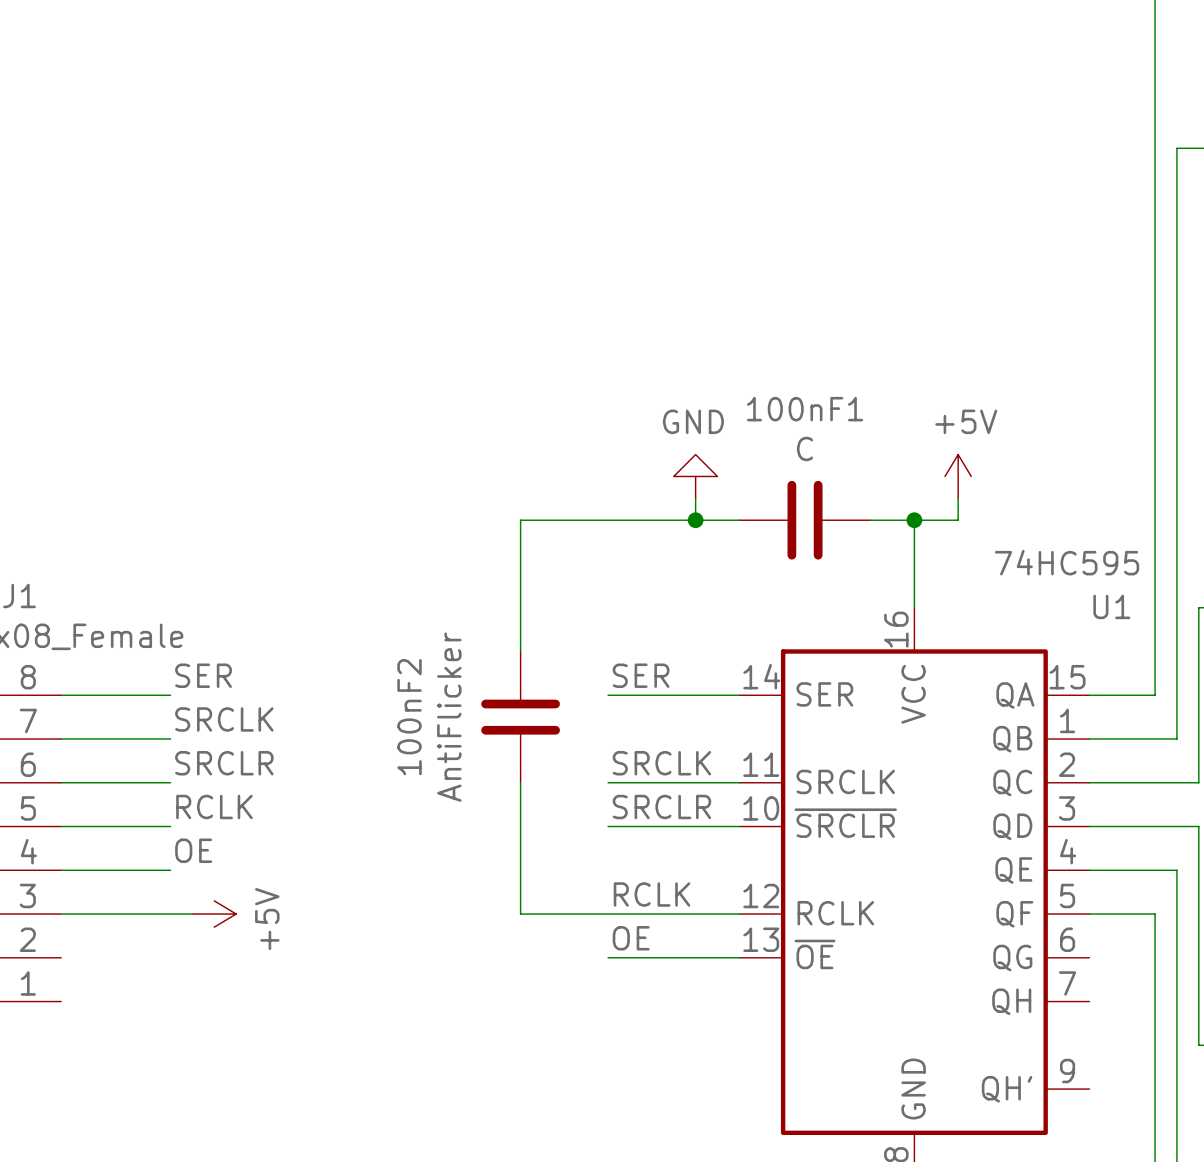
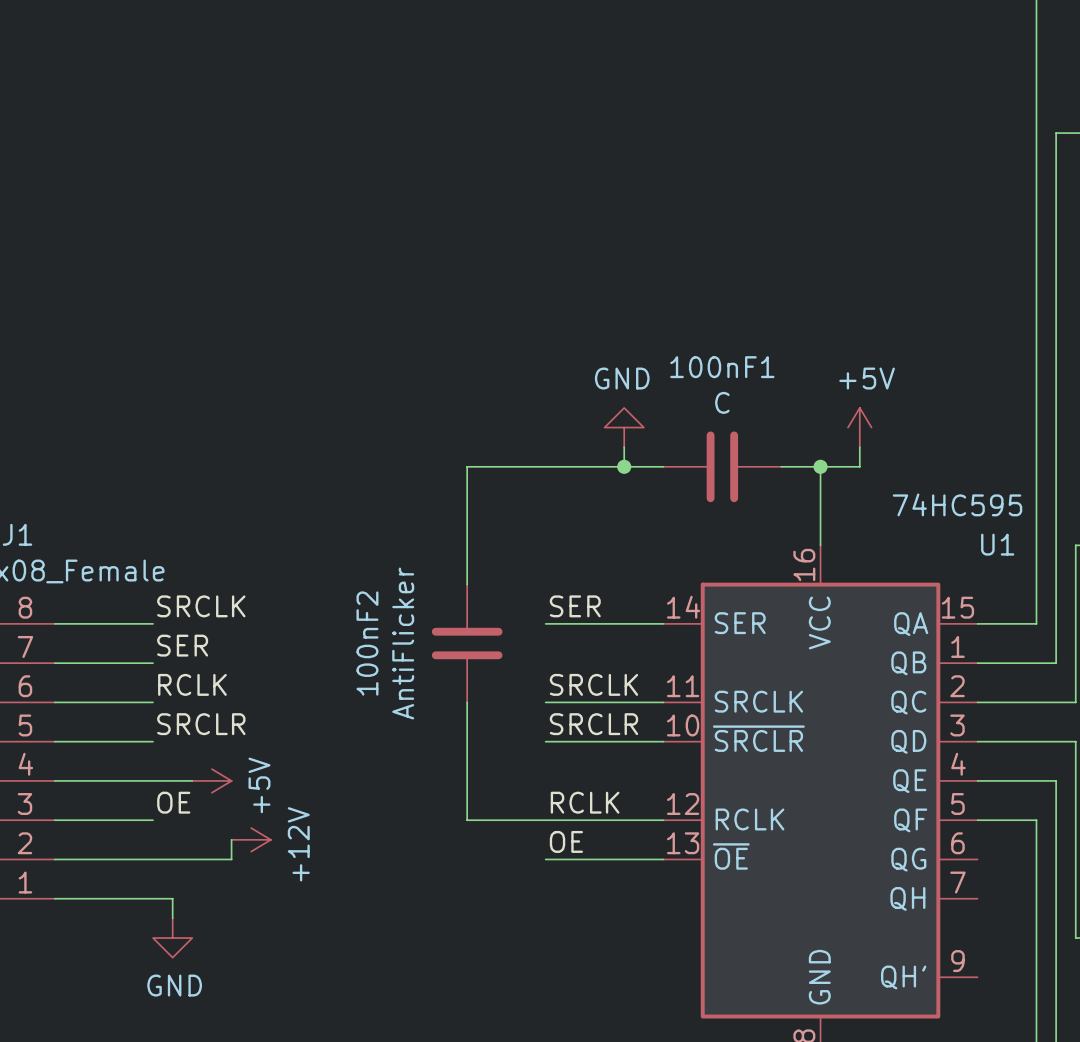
label: SER (203, 675) -> SRCLK (201, 606)
label: SRCLK (224, 719) -> SER (182, 645)
label: SRCLR (224, 763) -> RCLK (192, 684)
label: RCLK (214, 807) -> SRCLR (201, 724)
label position: OE (193, 850) -> OE (173, 802)
wire: none -> (153, 780) (192, 780)
wire: (170, 914) (192, 914) -> none
power symbol position: +5V (214, 914) -> +5V (211, 780)
wire: none -> (231, 839) (231, 859) (54, 859)
power symbol: none -> +12V (251, 839)
wire: none -> (54, 898) (172, 898) (172, 918)
power symbol: none -> GND (172, 938)

